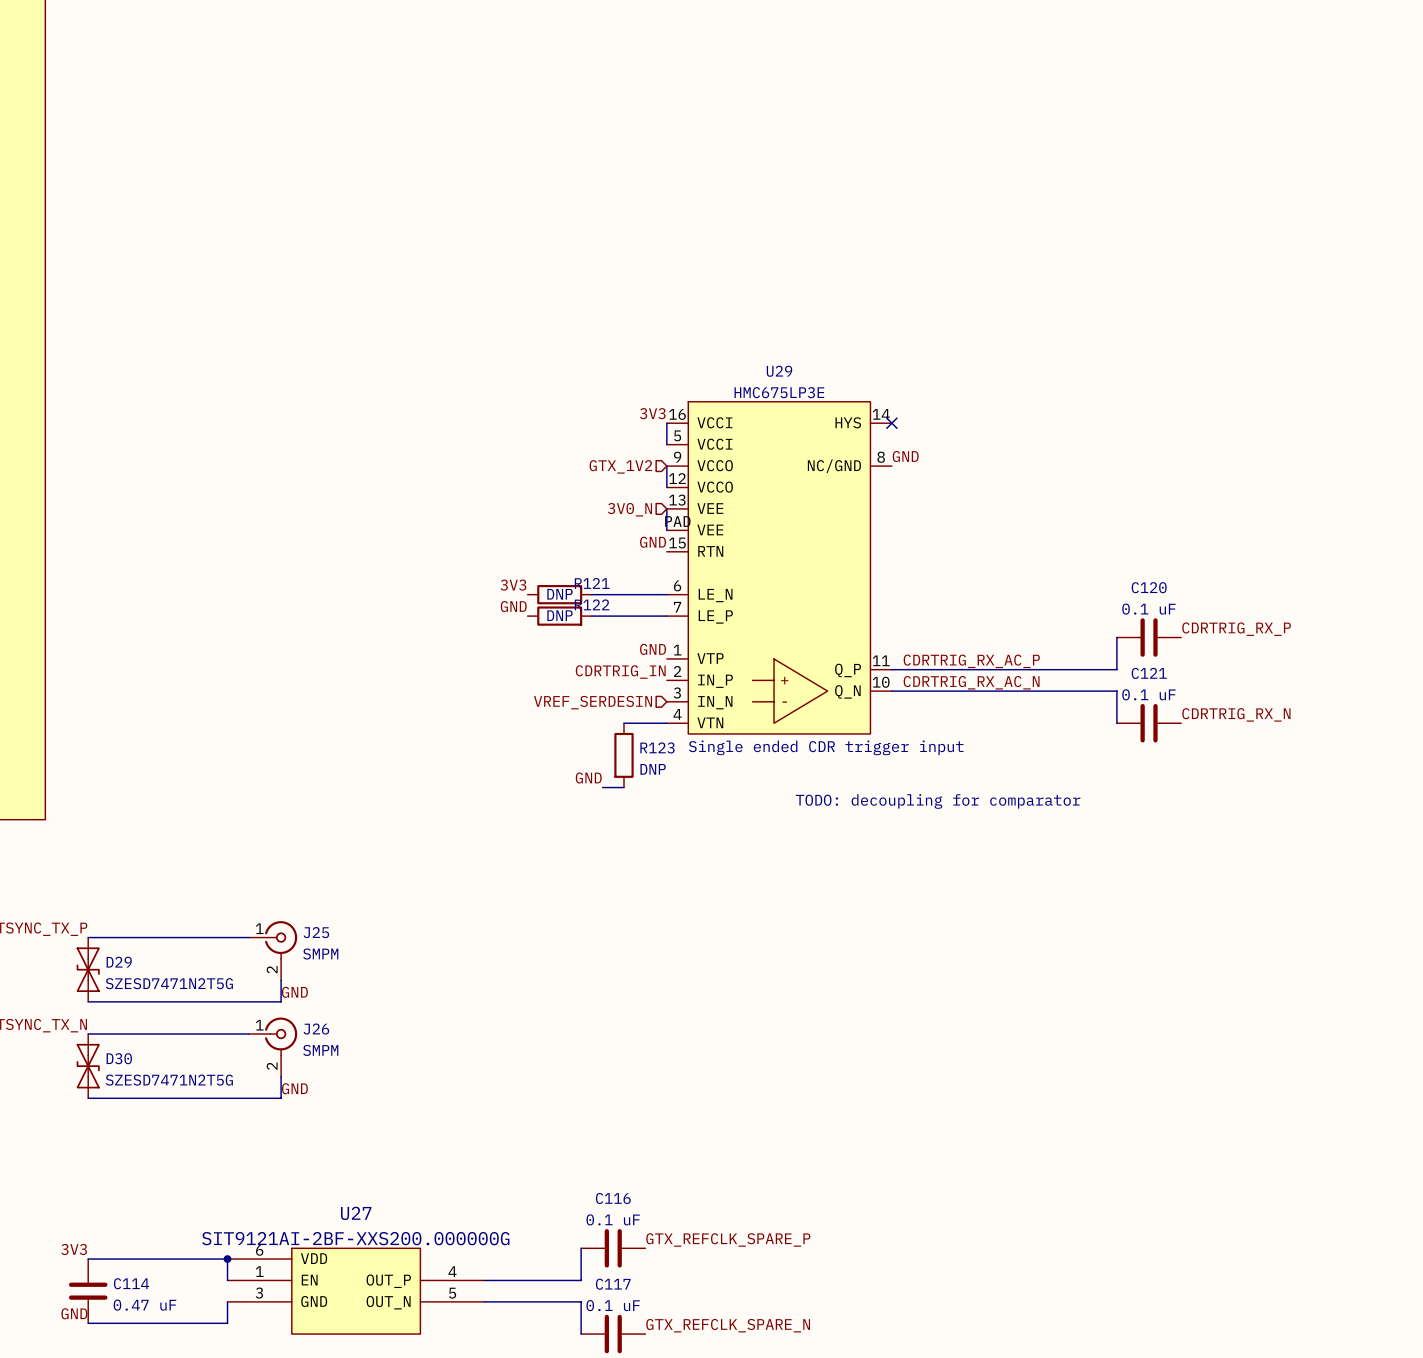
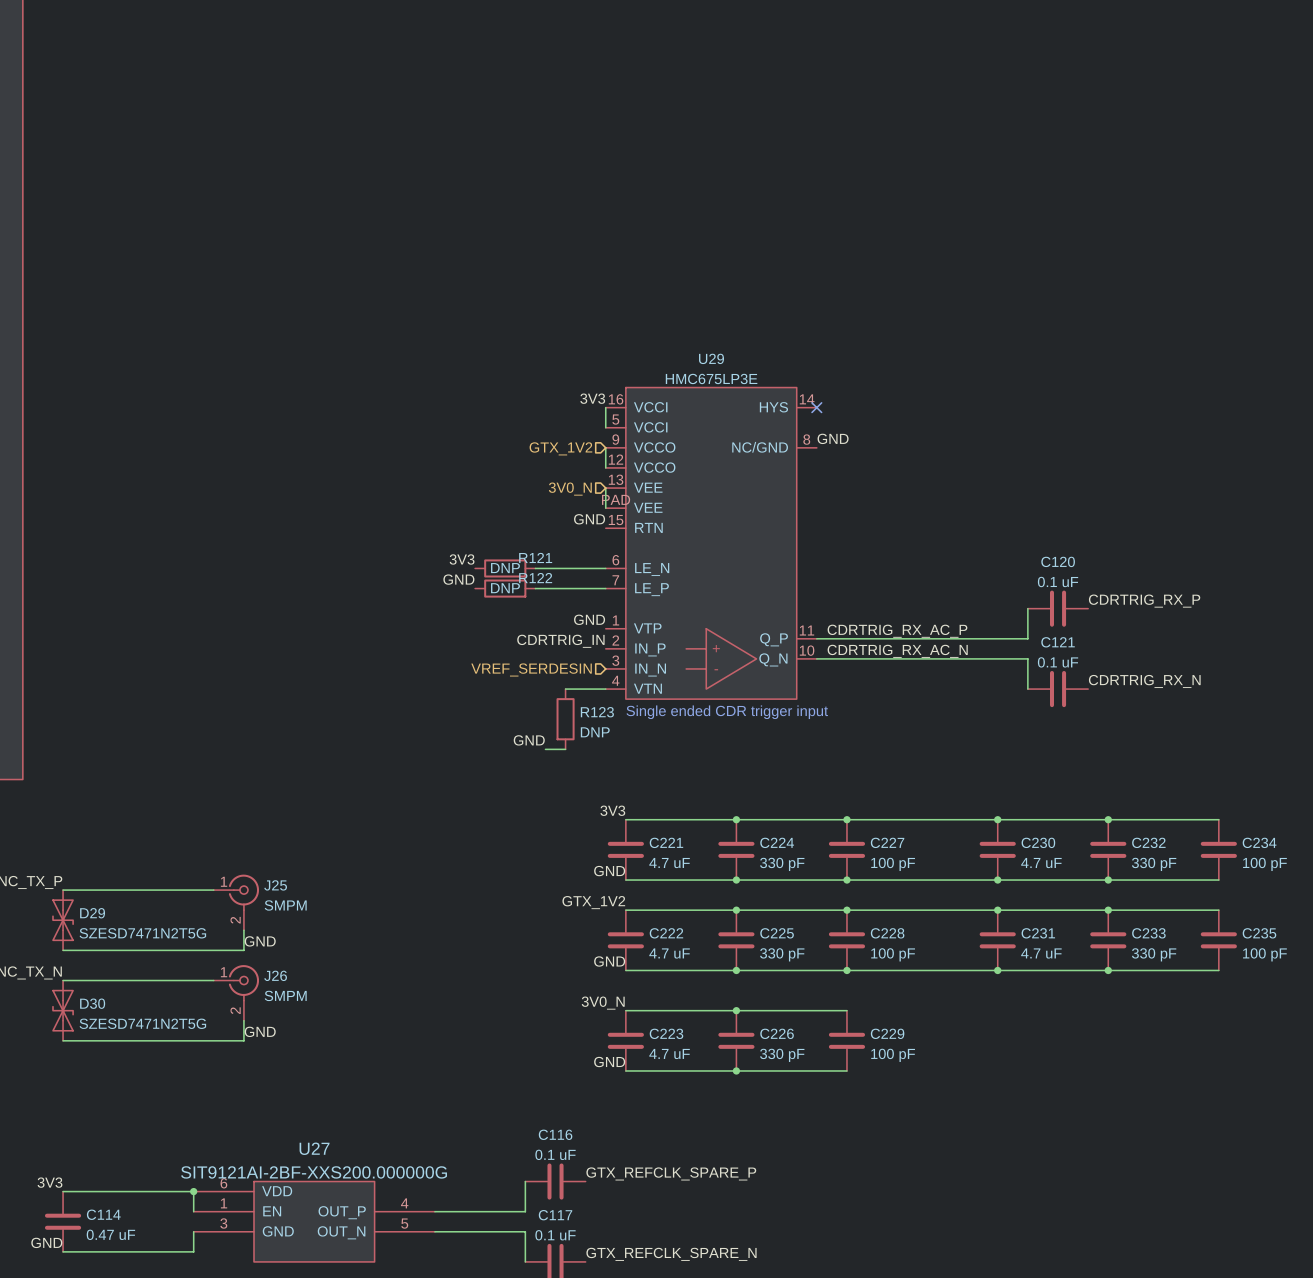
text: TODO: decoupling for comparator (938, 801) -> none
label: none -> 3V3 (612, 810)
wire: none -> (625, 819) (1218, 819)
junction: none -> (736, 819)
junction: none -> (846, 819)
junction: none -> (997, 819)
junction: none -> (1108, 819)
C221: none -> 4.7 uF (625, 849)
C224: none -> 330 pF (736, 849)
C227: none -> 100 pF (846, 849)
C230: none -> 4.7 uF (997, 849)
C232: none -> 330 pF (1108, 849)
C234: none -> 100 pF (1218, 849)
label: none -> GND (609, 871)
wire: none -> (625, 880) (1218, 880)
junction: none -> (736, 880)
junction: none -> (846, 880)
junction: none -> (997, 880)
junction: none -> (1108, 880)
label: none -> GTX_1V2 (593, 902)
wire: none -> (625, 910) (1218, 910)
junction: none -> (736, 910)
junction: none -> (846, 910)
junction: none -> (997, 910)
junction: none -> (1108, 910)
C222: none -> 4.7 uF (625, 940)
C225: none -> 330 pF (736, 940)
C228: none -> 100 pF (846, 940)
C231: none -> 4.7 uF (997, 940)
C233: none -> 330 pF (1108, 940)
C235: none -> 100 pF (1218, 940)
label: none -> GND (609, 961)
wire: none -> (625, 970) (1218, 970)
junction: none -> (736, 970)
junction: none -> (846, 970)
junction: none -> (997, 970)
junction: none -> (1108, 970)
label: none -> 3V0_N (603, 1003)
wire: none -> (625, 1010) (846, 1010)
junction: none -> (736, 1010)
C223: none -> 4.7 uF (625, 1040)
C226: none -> 330 pF (736, 1040)
C229: none -> 100 pF (846, 1040)
label: none -> GND (609, 1062)
wire: none -> (625, 1070) (846, 1070)
junction: none -> (736, 1070)

